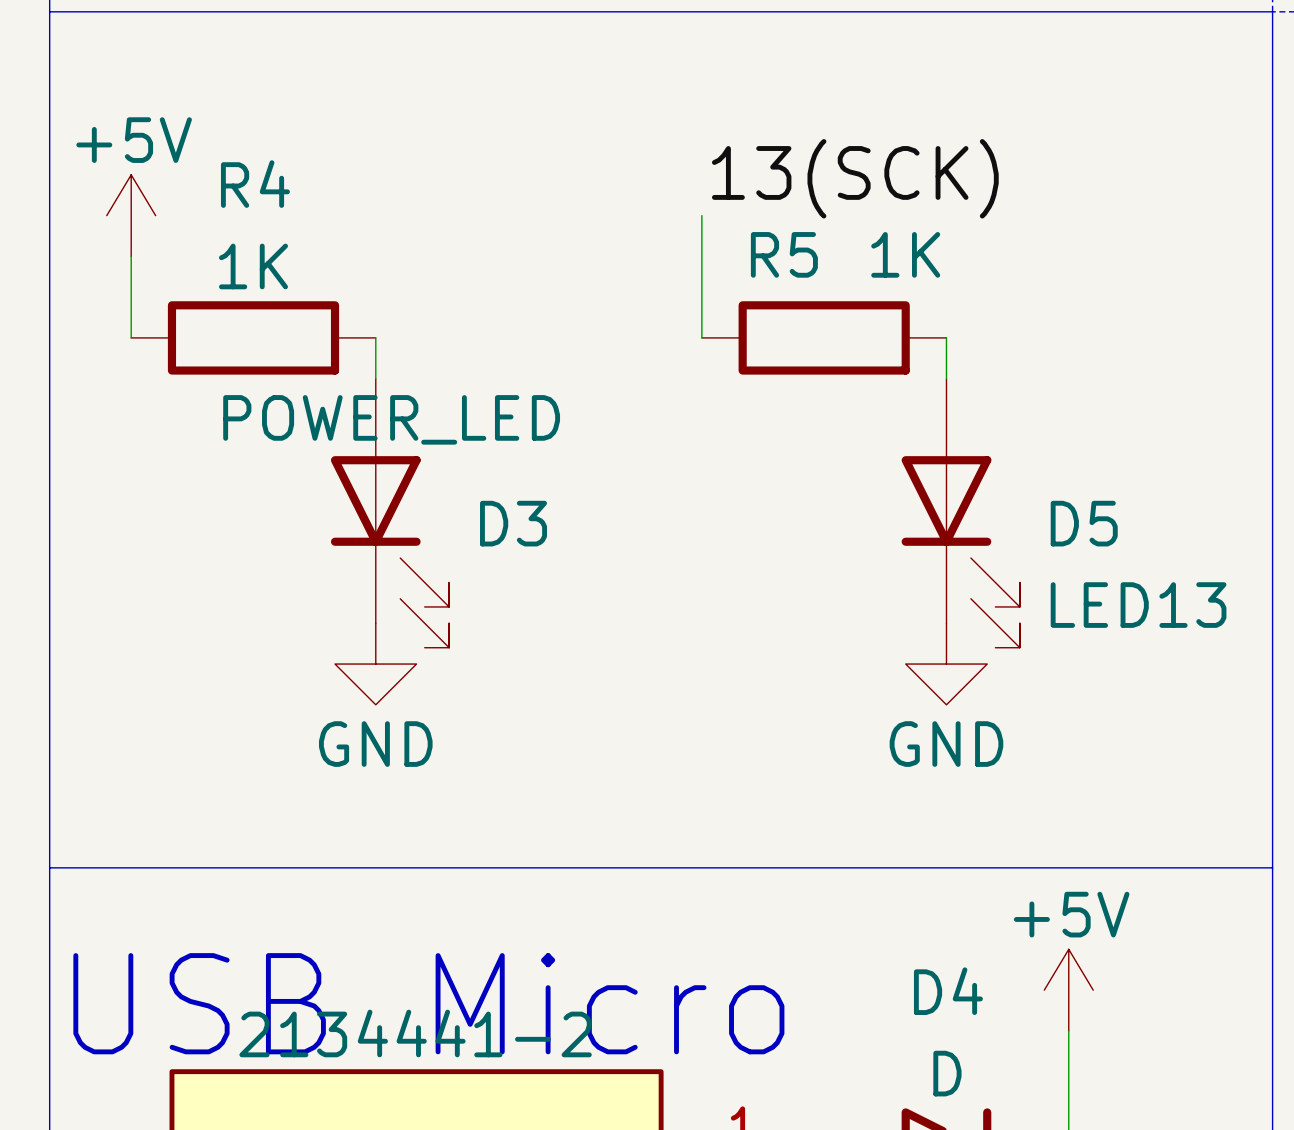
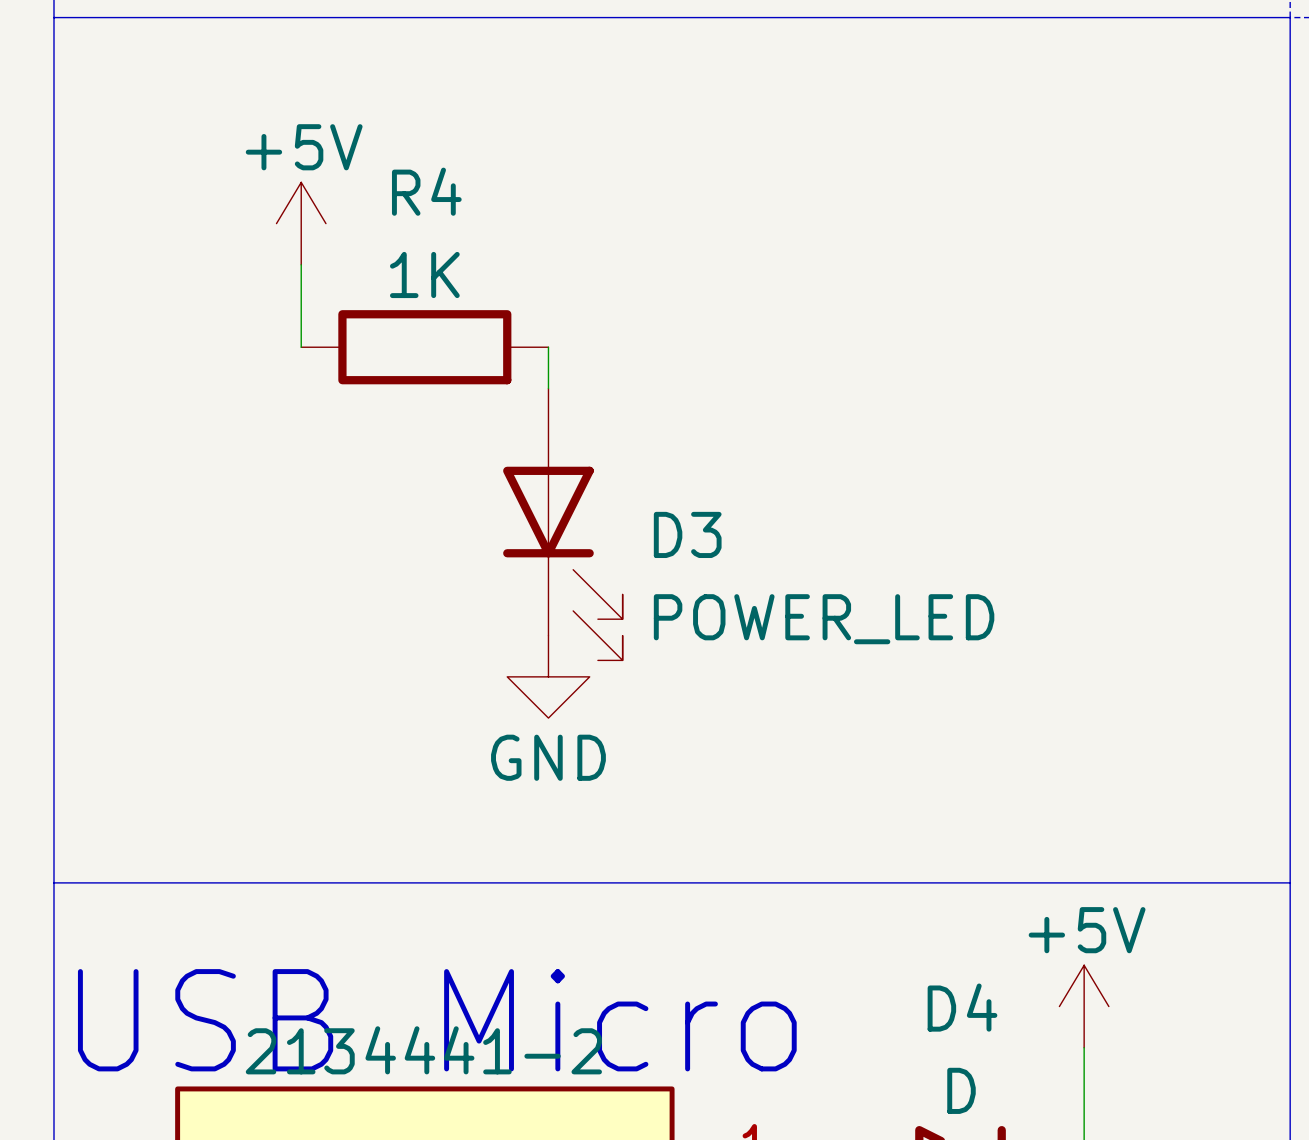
label: 13(SCK) (855, 178) -> none
power symbol position: +5V (131, 215) -> +5V (301, 223)
wire: (701, 215) (701, 337) -> none
wire: (131, 256) (131, 337) -> (301, 264) (301, 347)
R4 position: (253, 337) -> (424, 347)
wire: (375, 337) (375, 378) -> (548, 347) (548, 388)
R5: 1K (824, 337) -> none
wire: (946, 337) (946, 378) -> none
D3 value position: POWER_LED (391, 419) -> POWER_LED (824, 619)
D3 position: (390, 513) -> (562, 524)
D5: LED13 (960, 513) -> none
power symbol position: GND (375, 664) -> GND (548, 676)
power symbol: GND (946, 664) -> none

